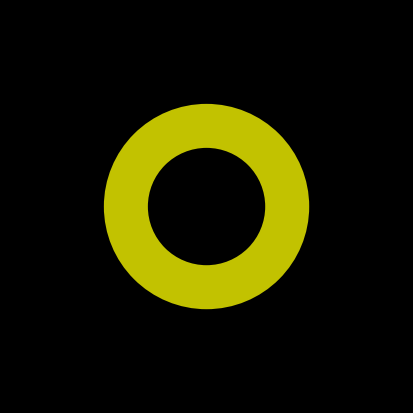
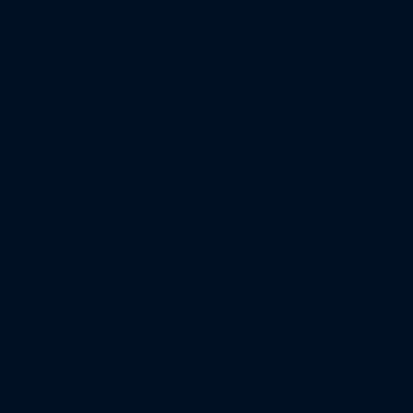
part: (206, 206) -> none

